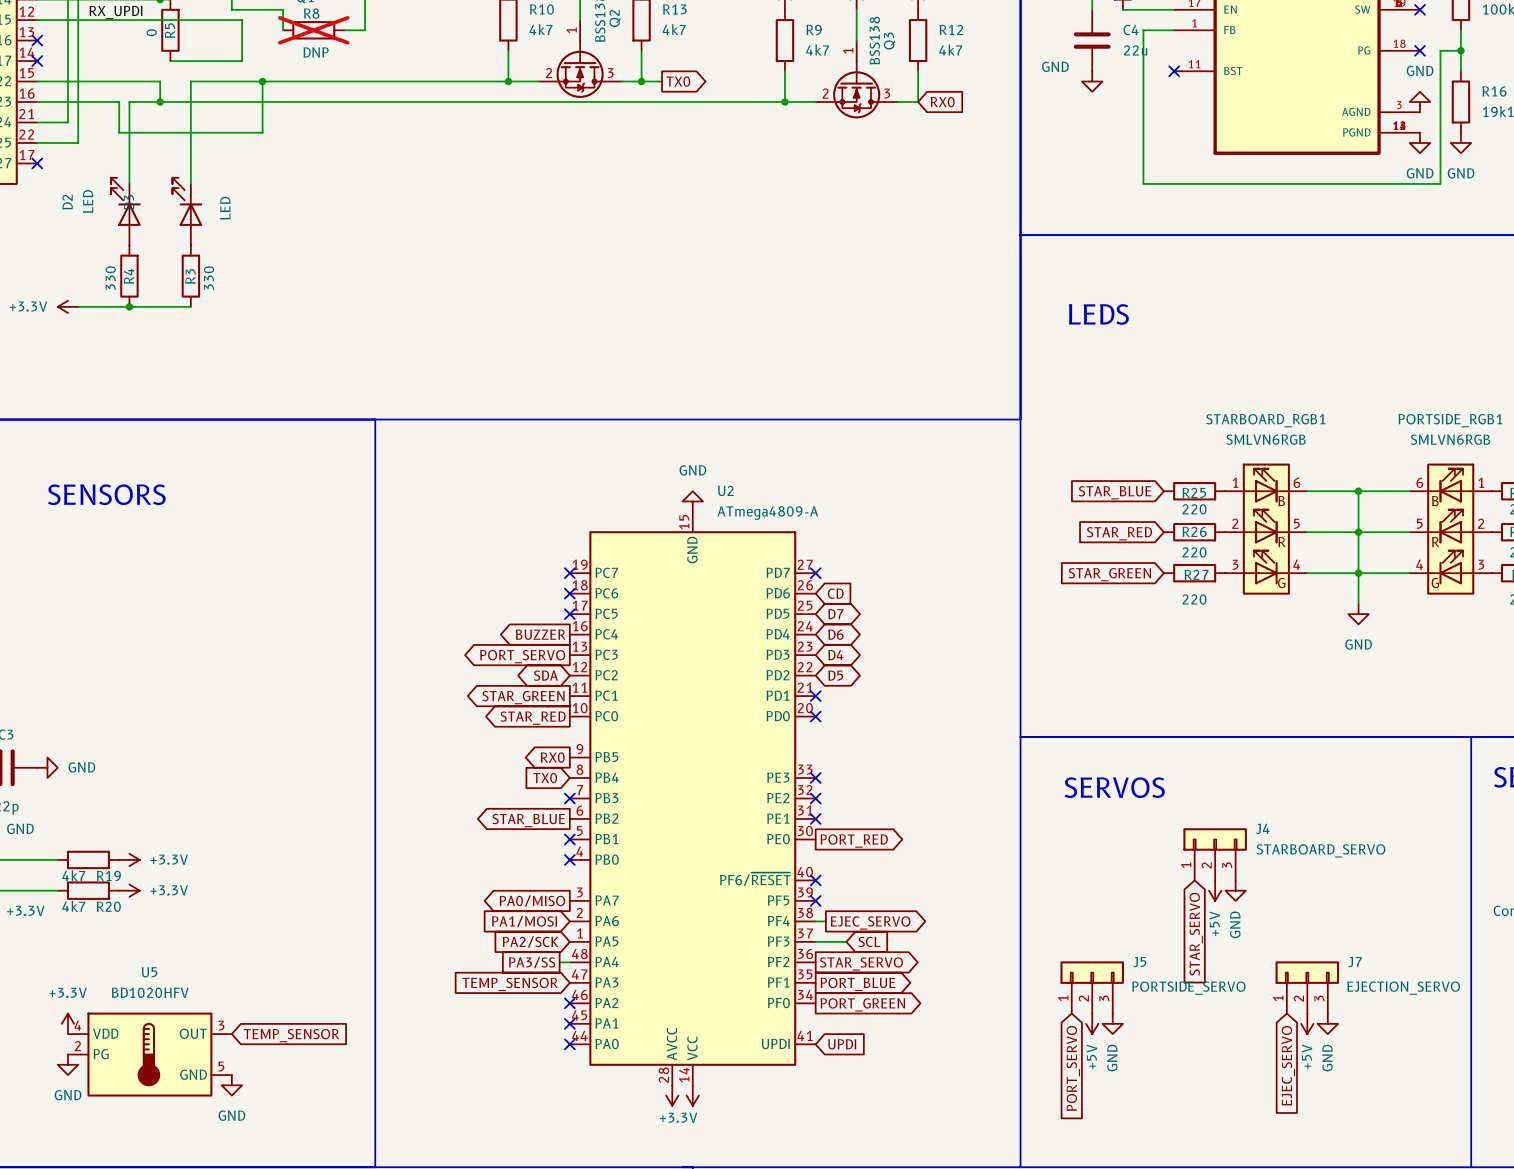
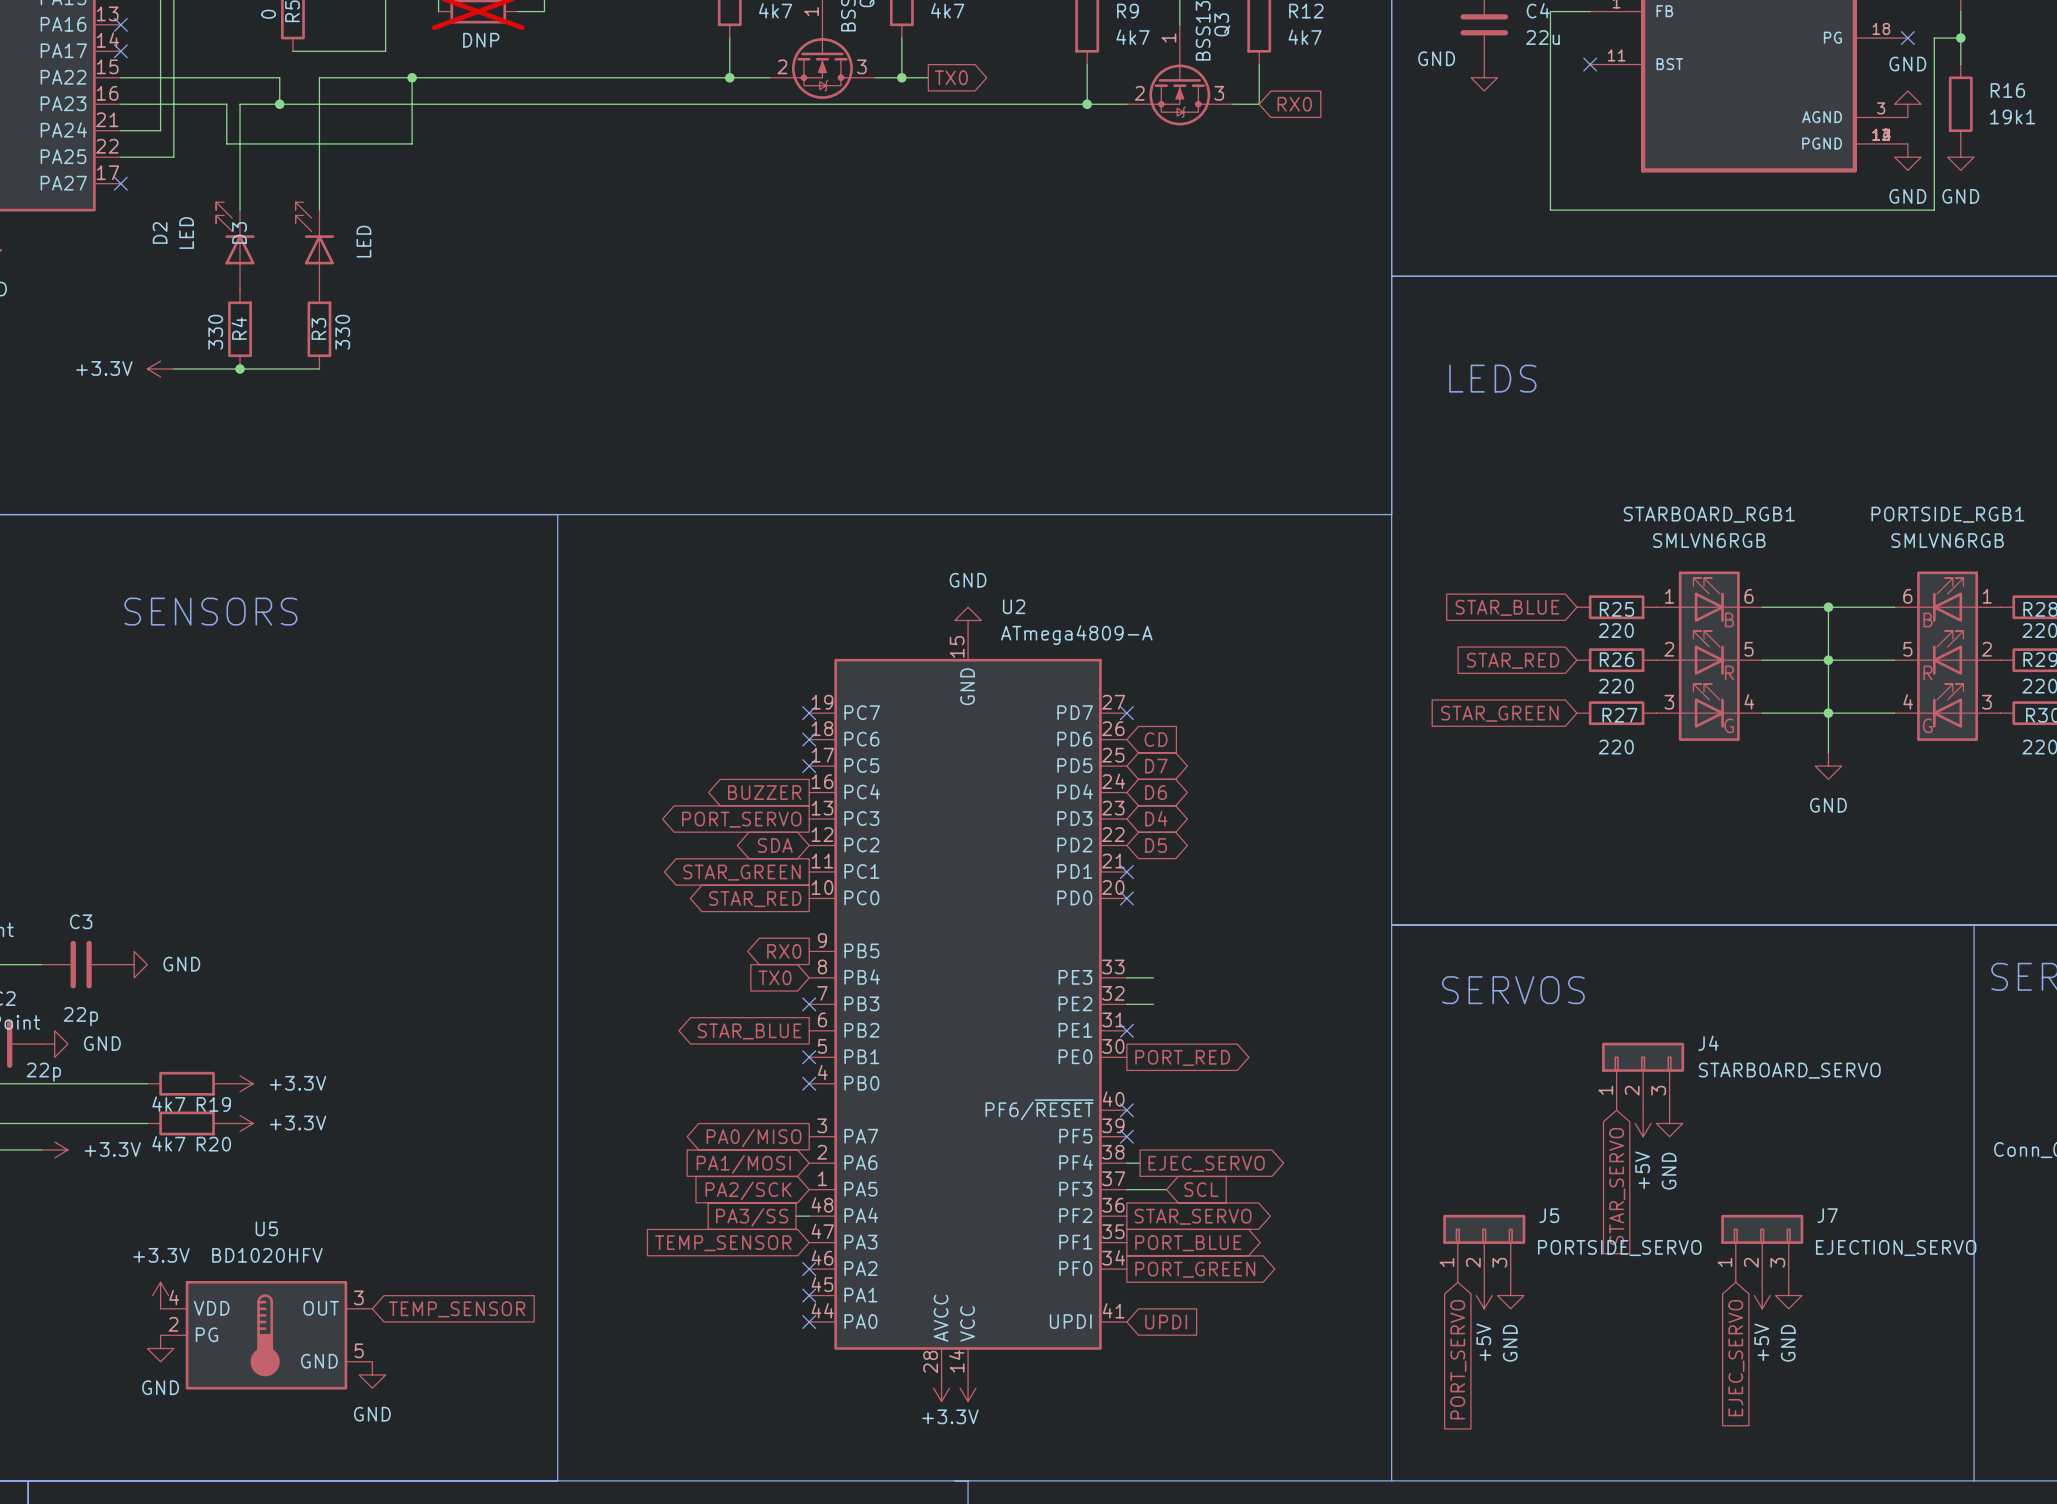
wire: none -> (1126, 977) (1153, 977)
no-connect mark: (815, 778) -> none
wire: none -> (1126, 1004) (1153, 1004)
no-connect mark: (815, 798) -> none

